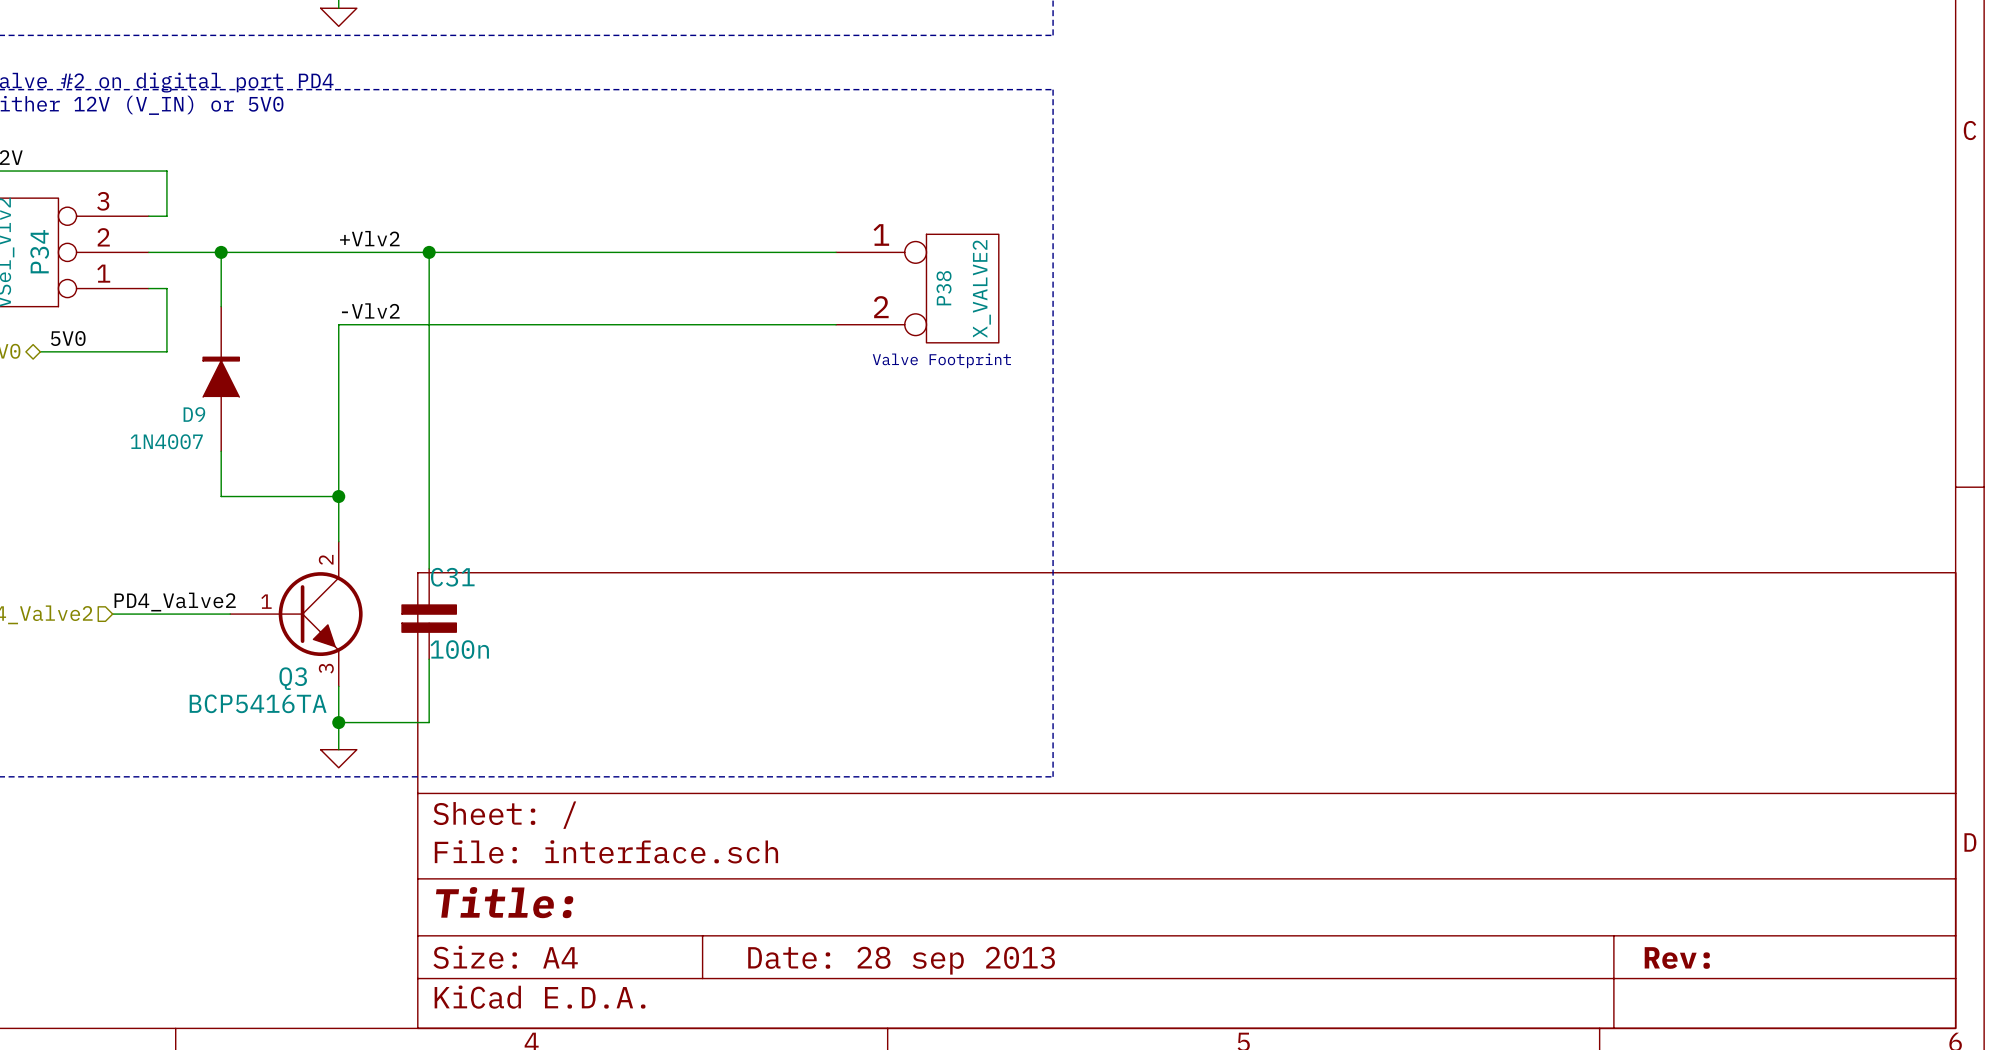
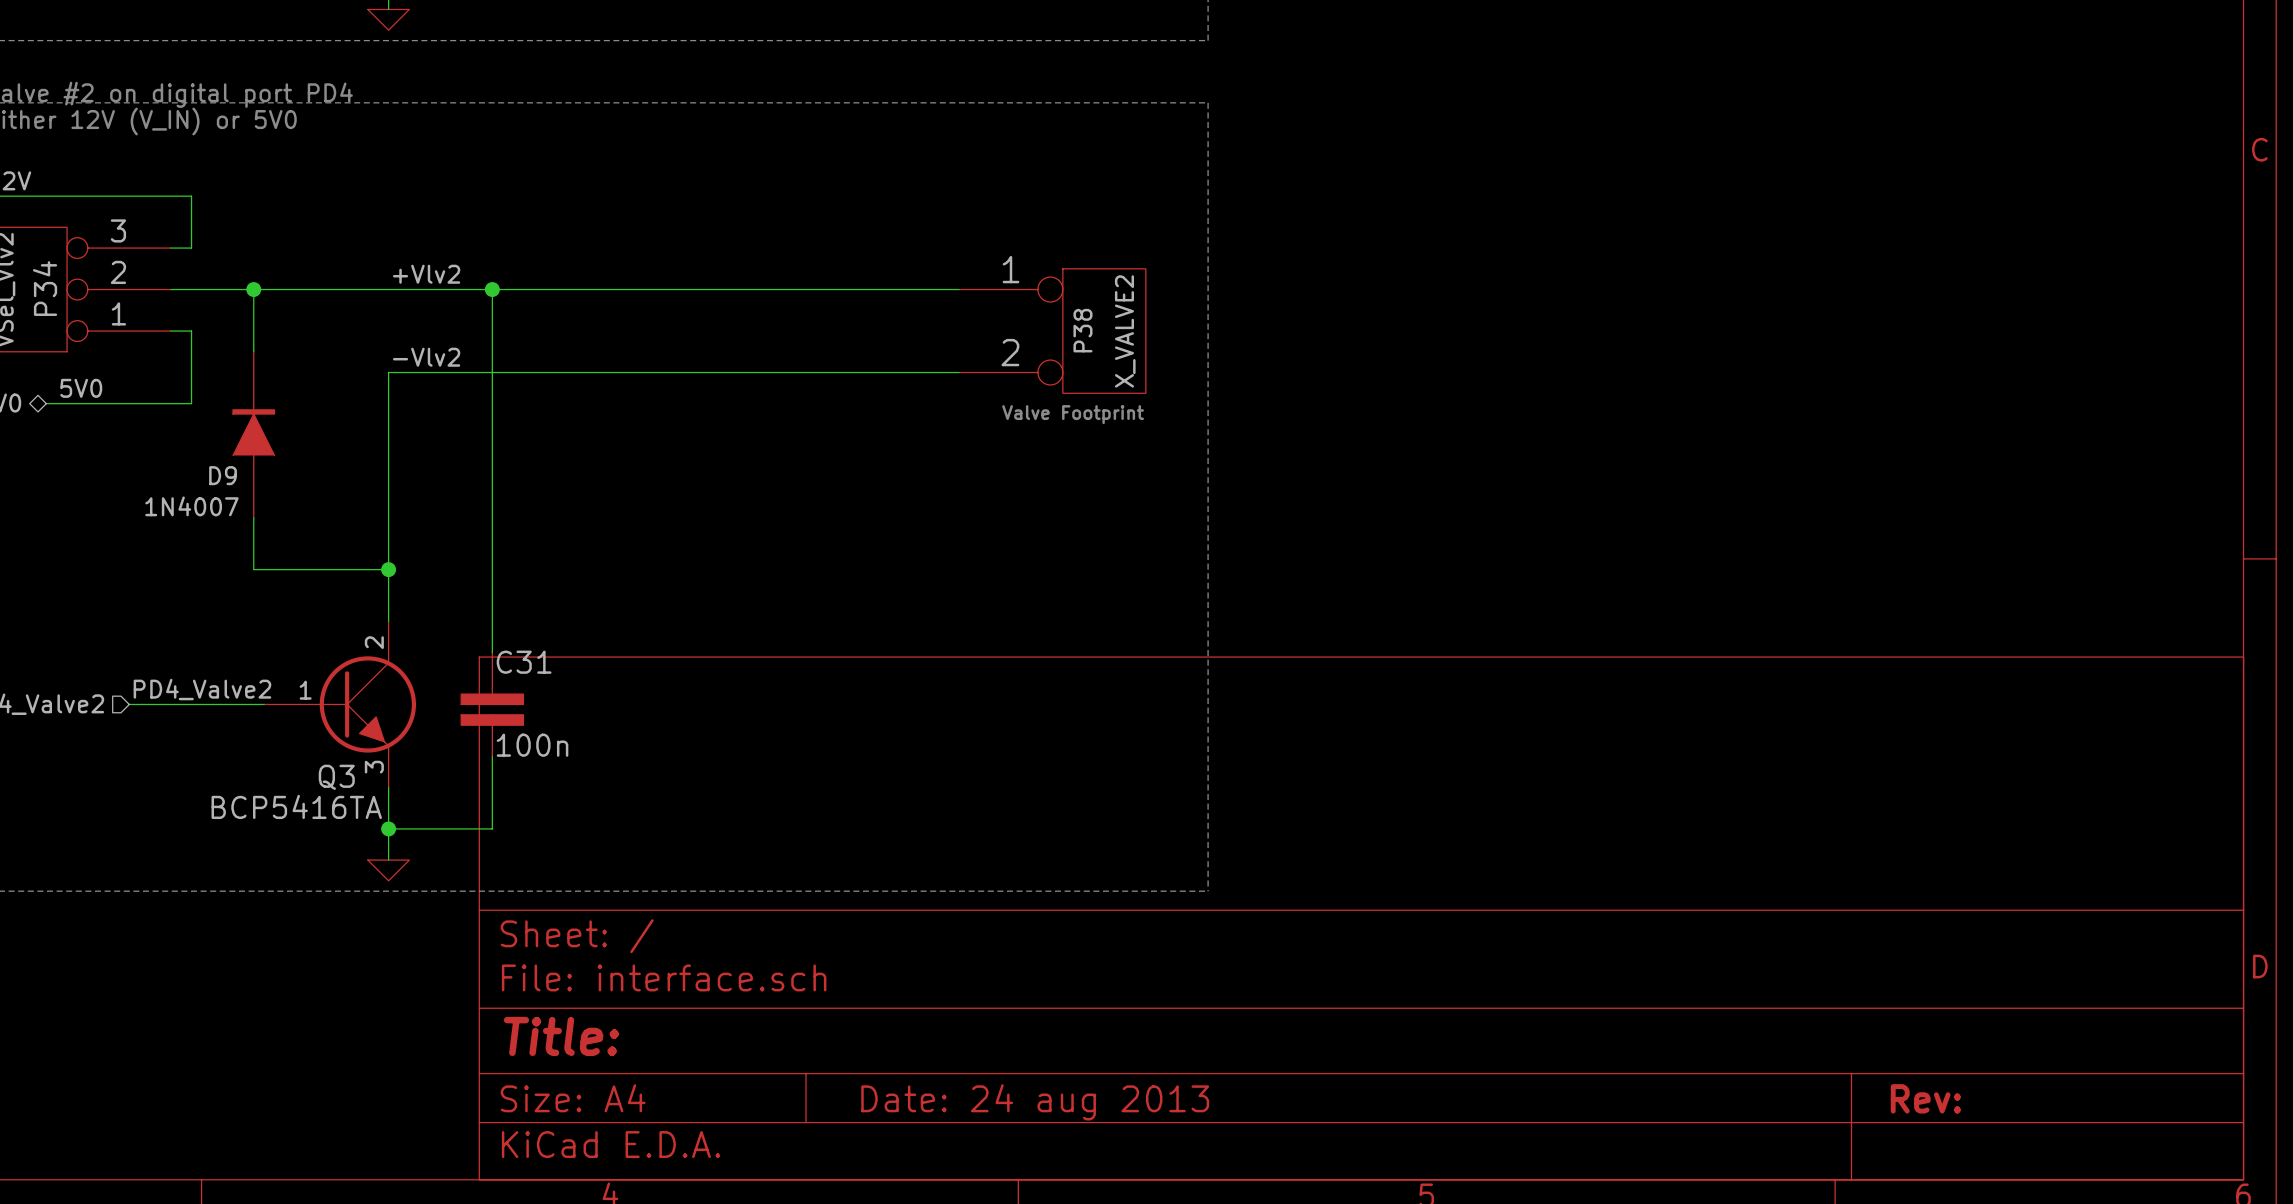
title block: Date: 28 sep 2013 (901, 960) -> Date: 24 aug 2013 (1035, 1102)

